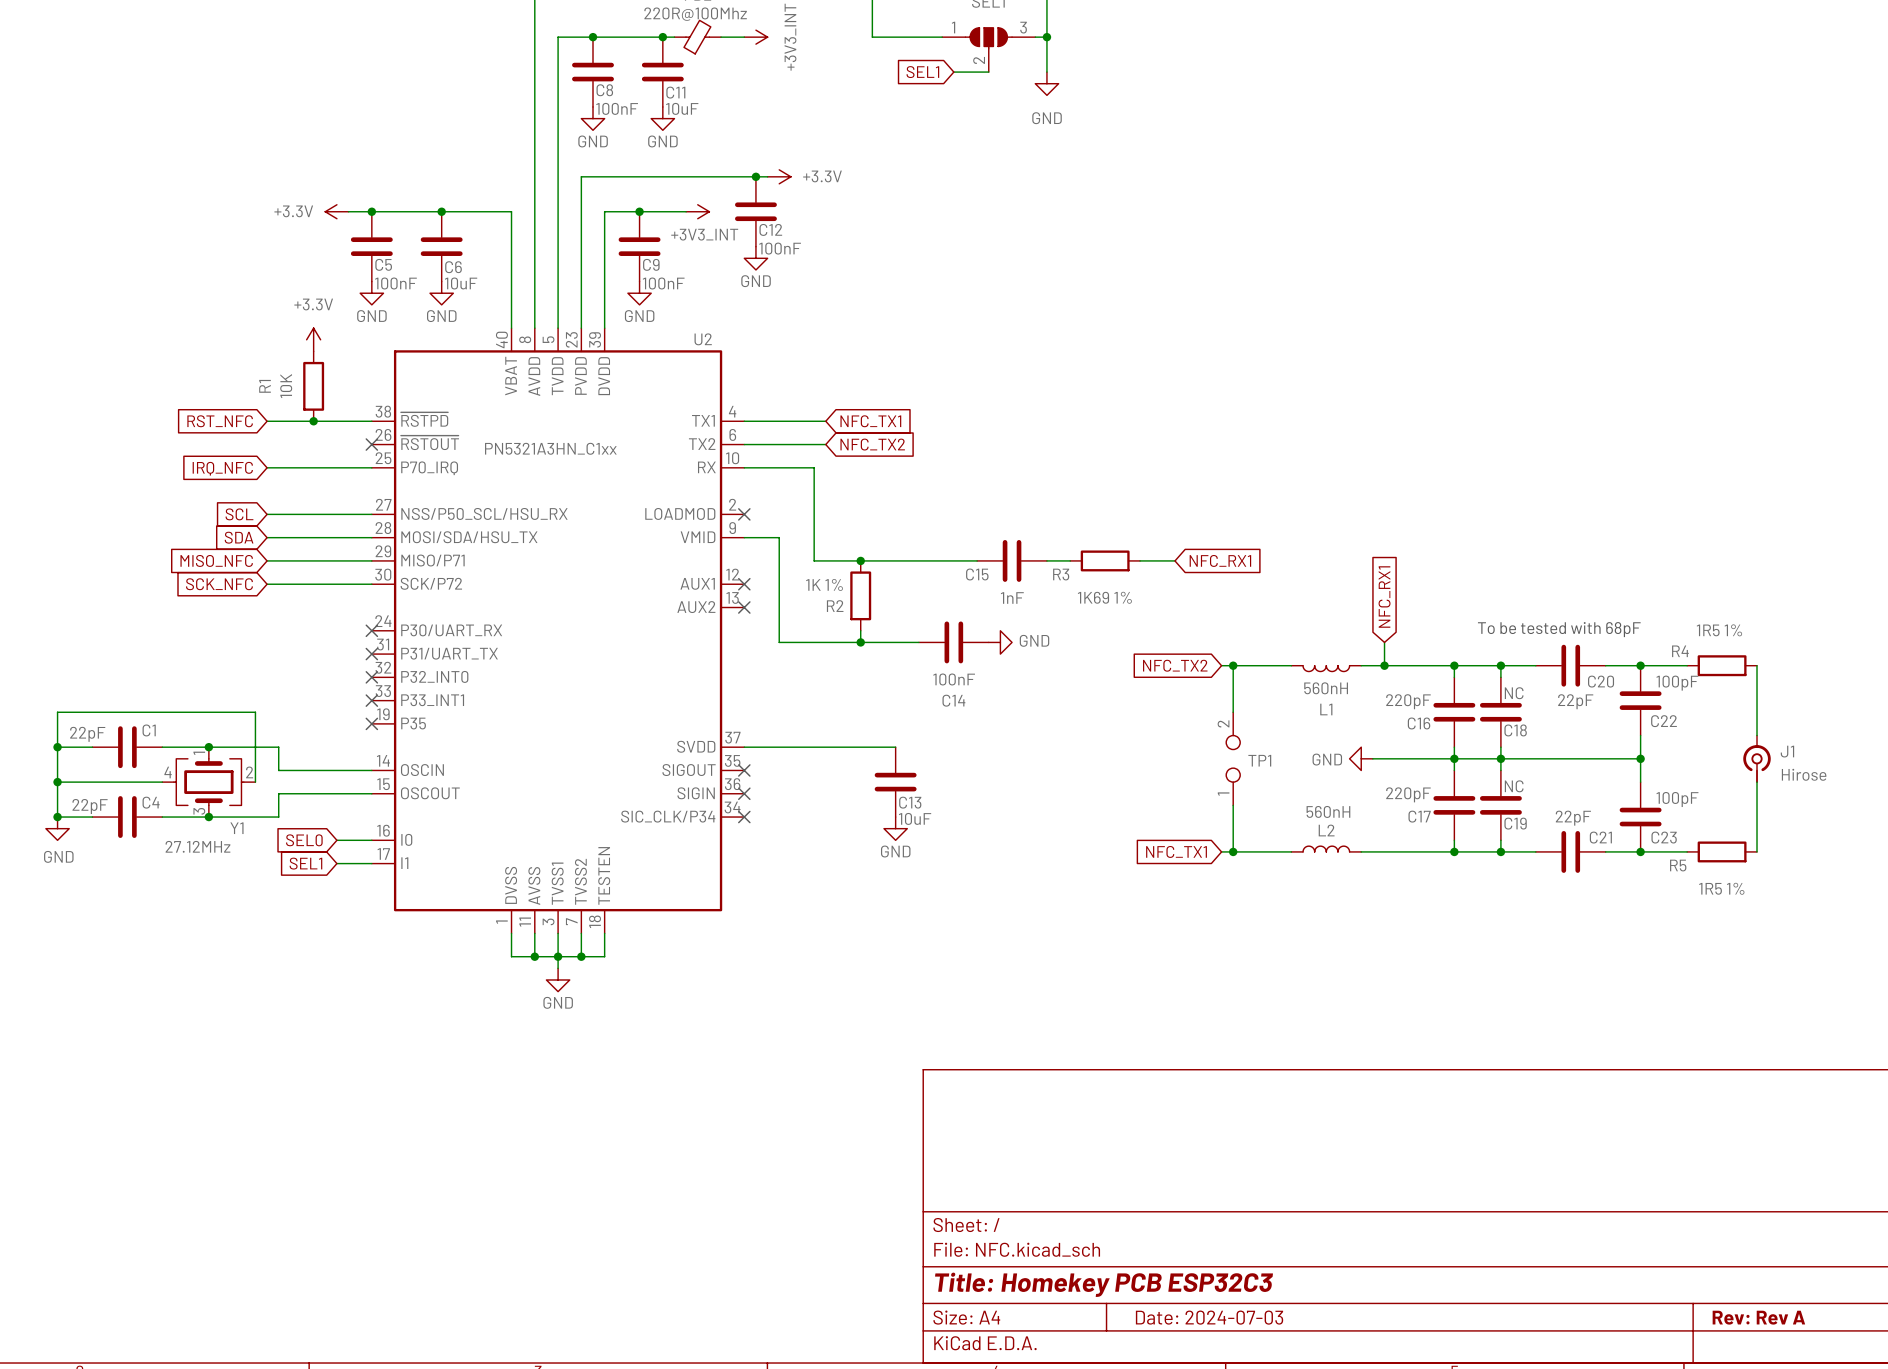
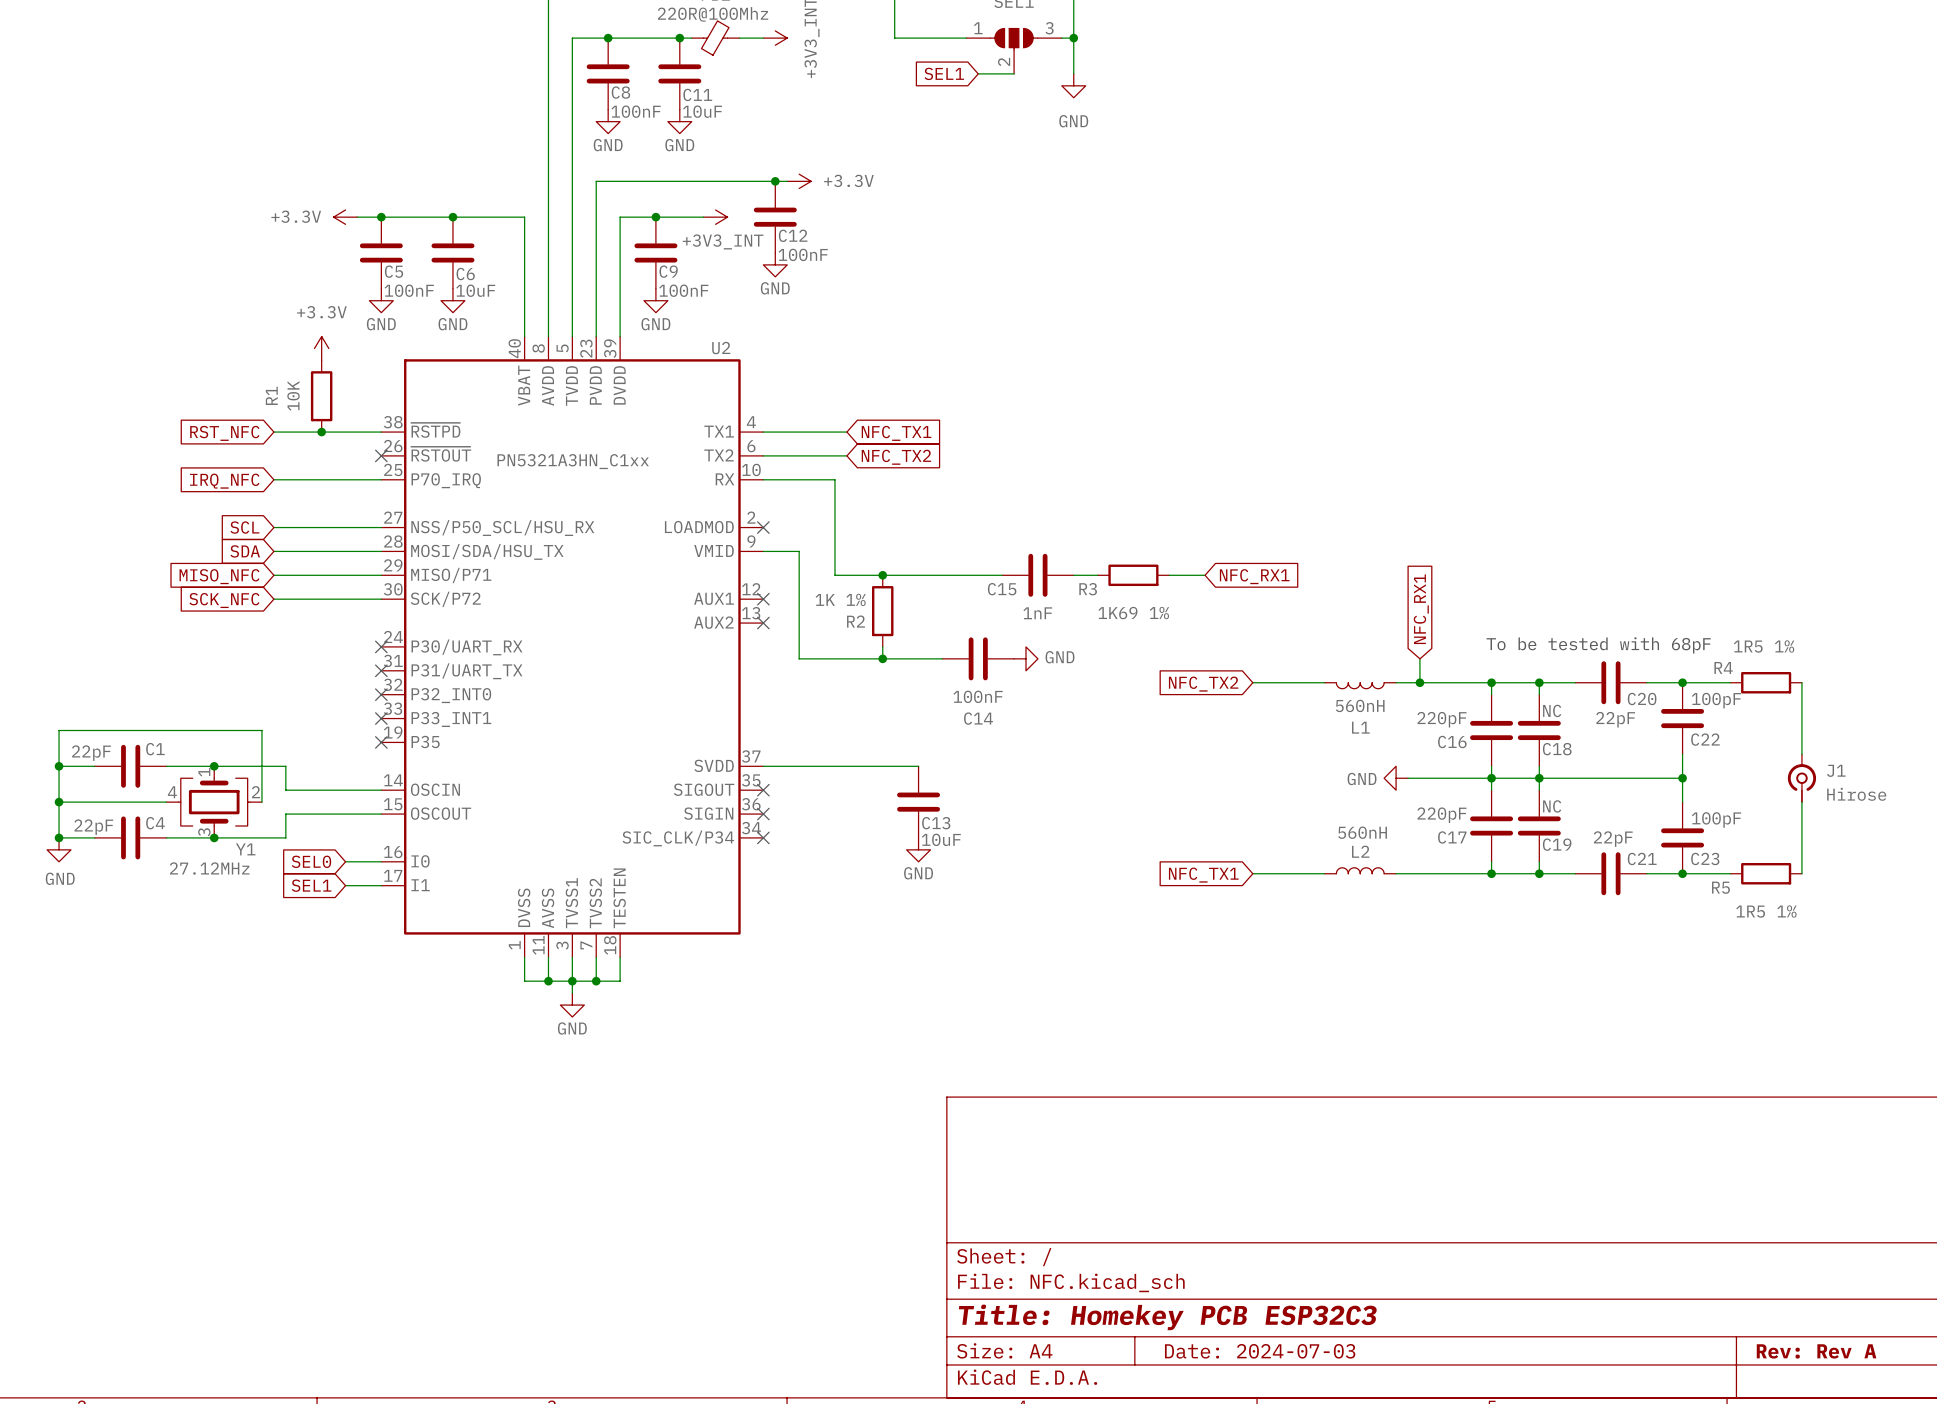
wire: (1233, 665) (1233, 712) -> none
junction: (1233, 665) -> none
TP1: (1233, 758) -> none
wire: (1233, 805) (1233, 851) -> none
junction: (1233, 851) -> none

